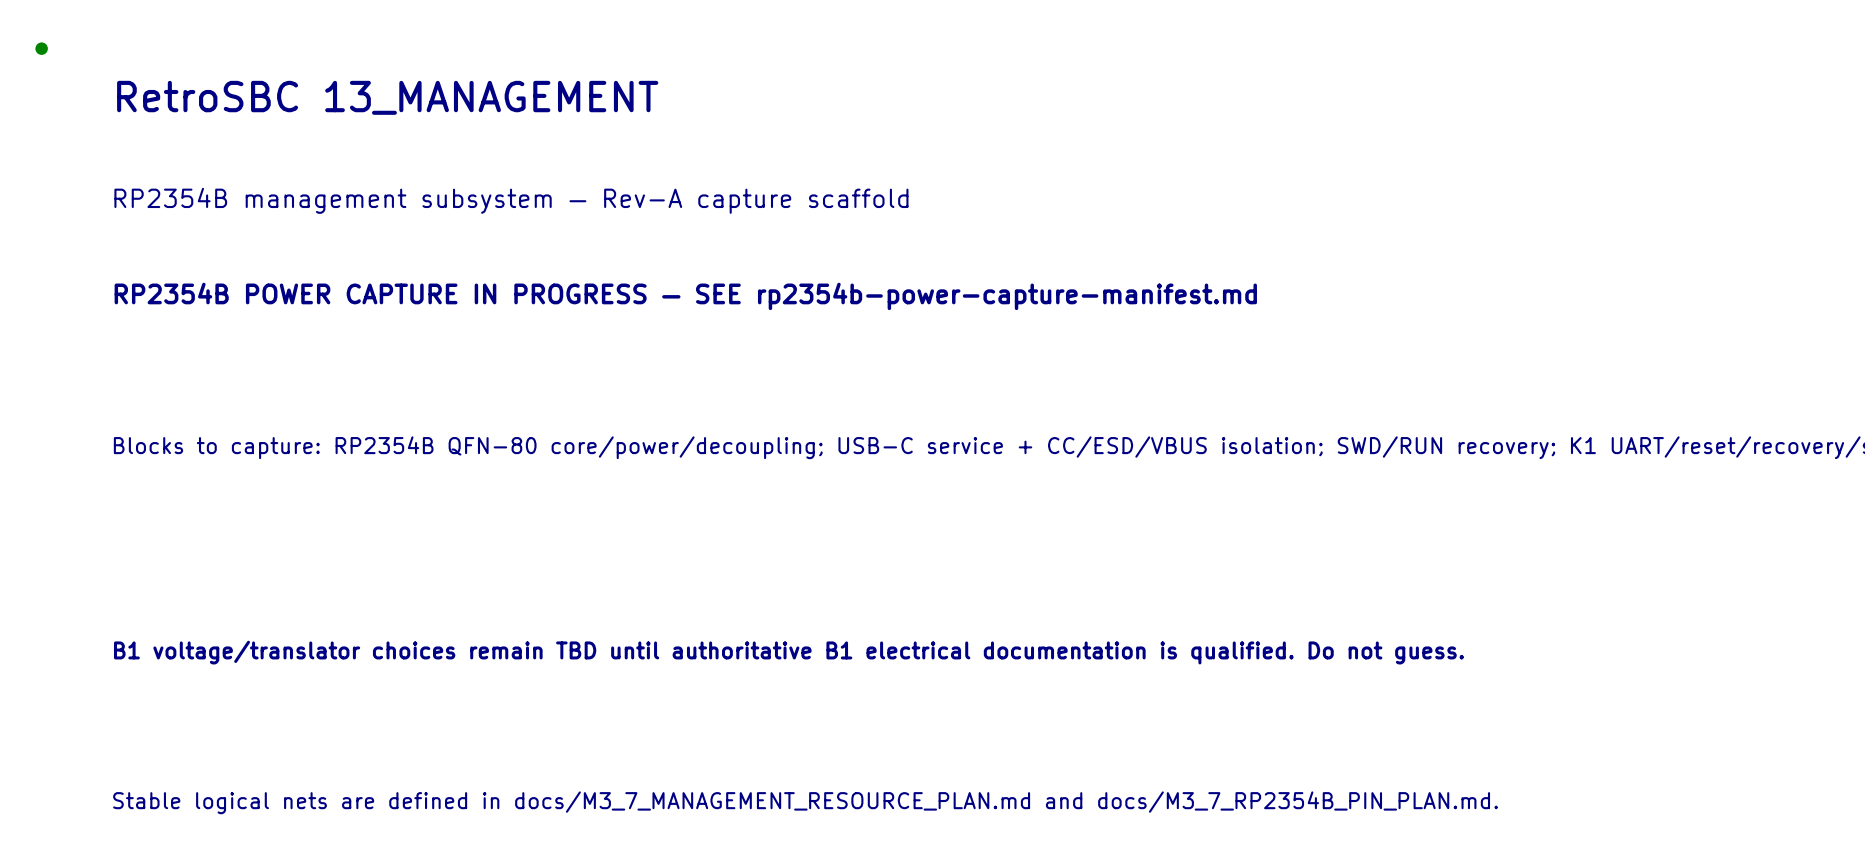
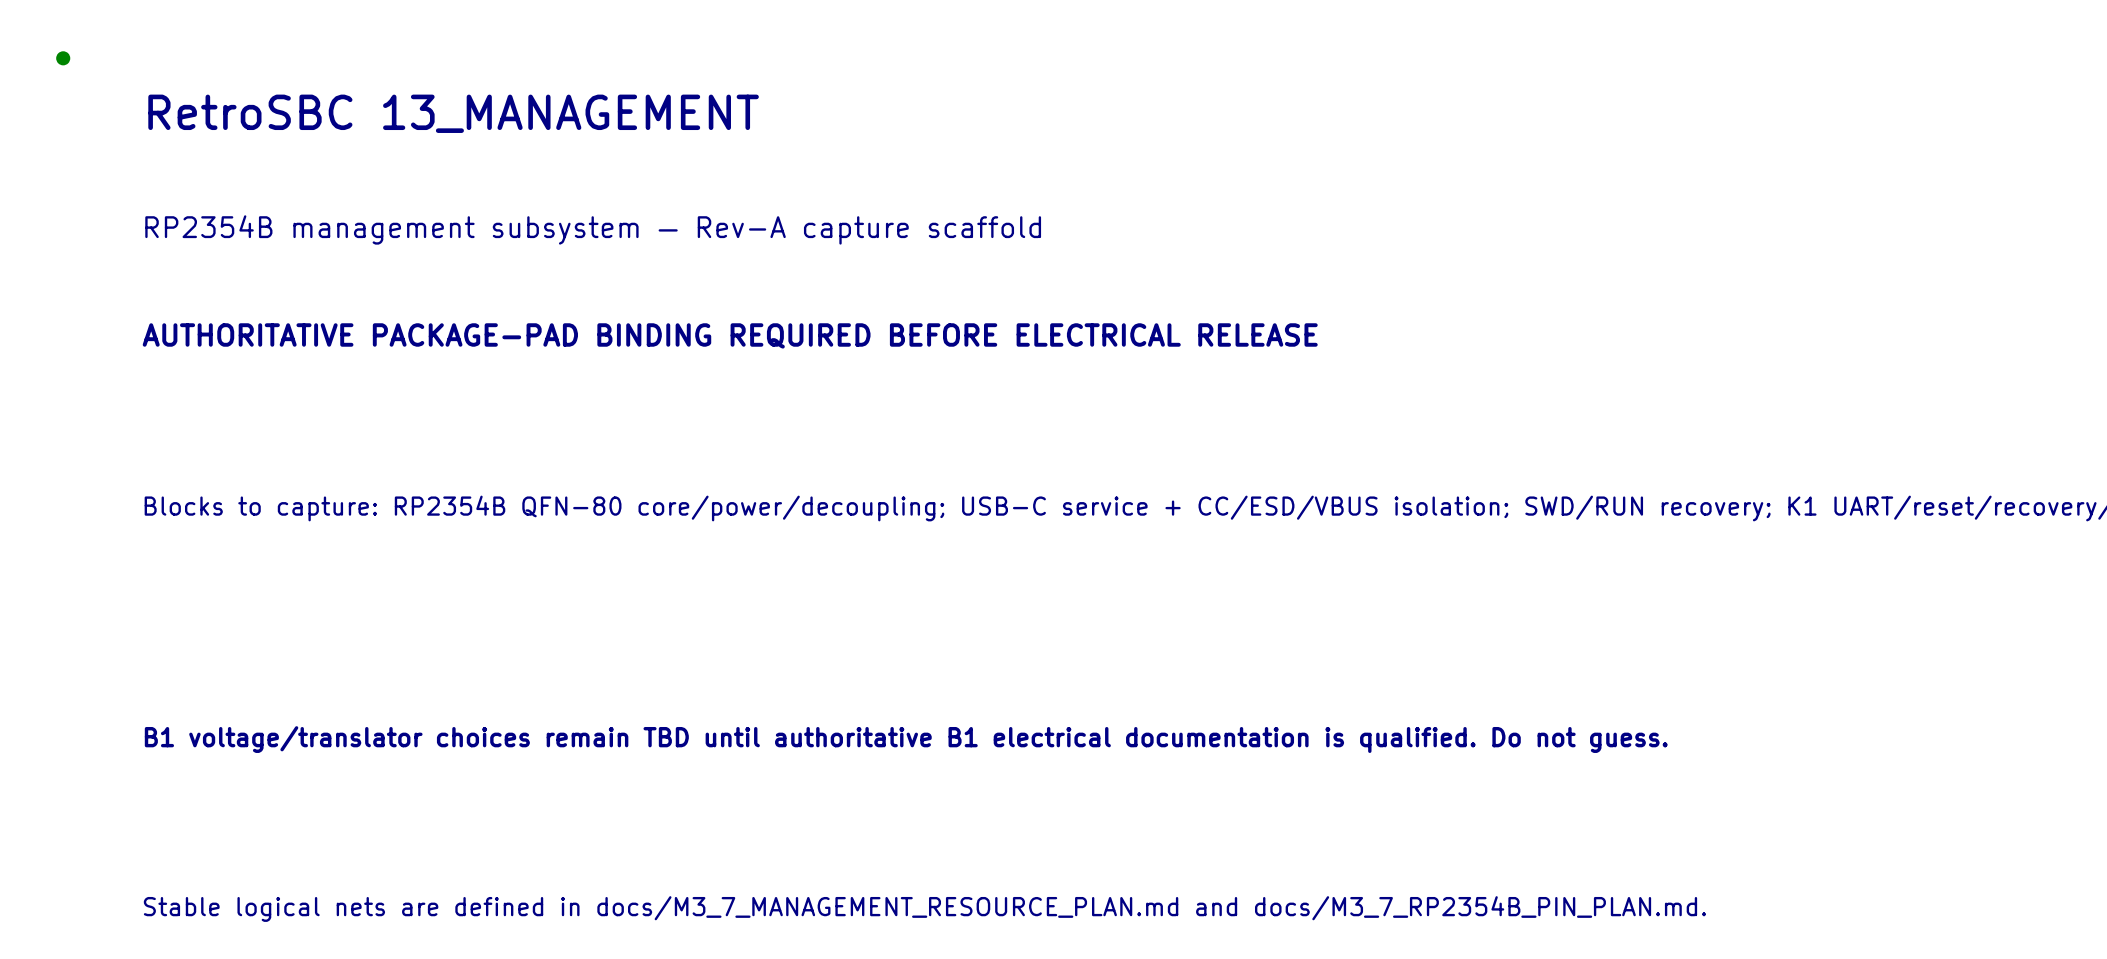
text: RP2354B POWER CAPTURE IN PROGRESS — SEE rp2354b-power-capture-manifest.md (685, 296) -> AUTHORITATIVE PACKAGE-PAD BINDING REQUIRED BEFORE ELECTRICAL RELEASE (730, 335)

